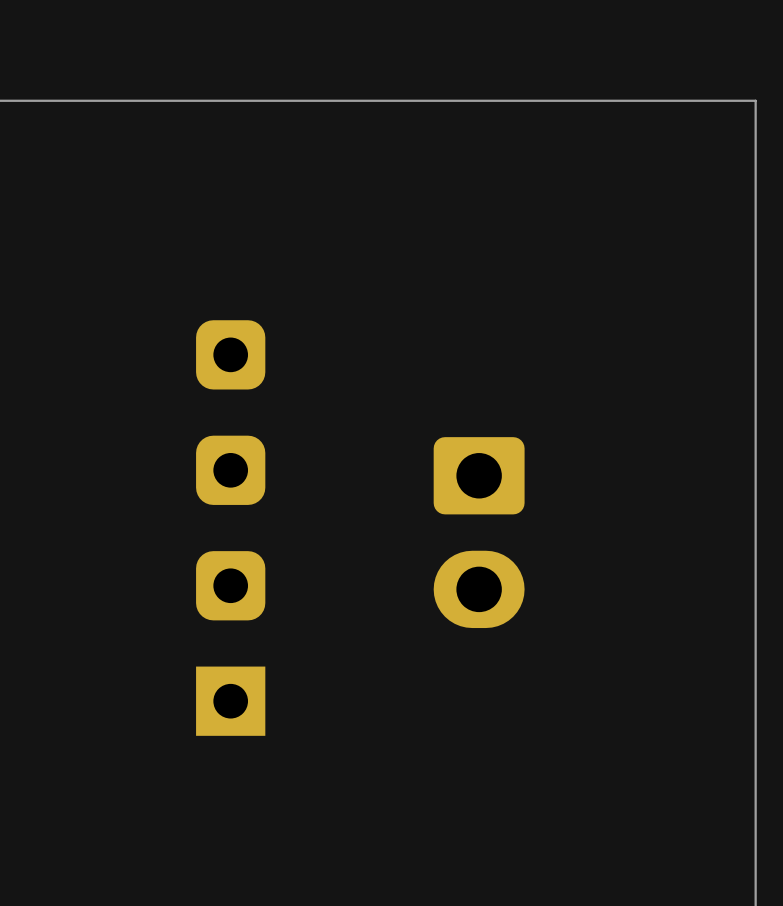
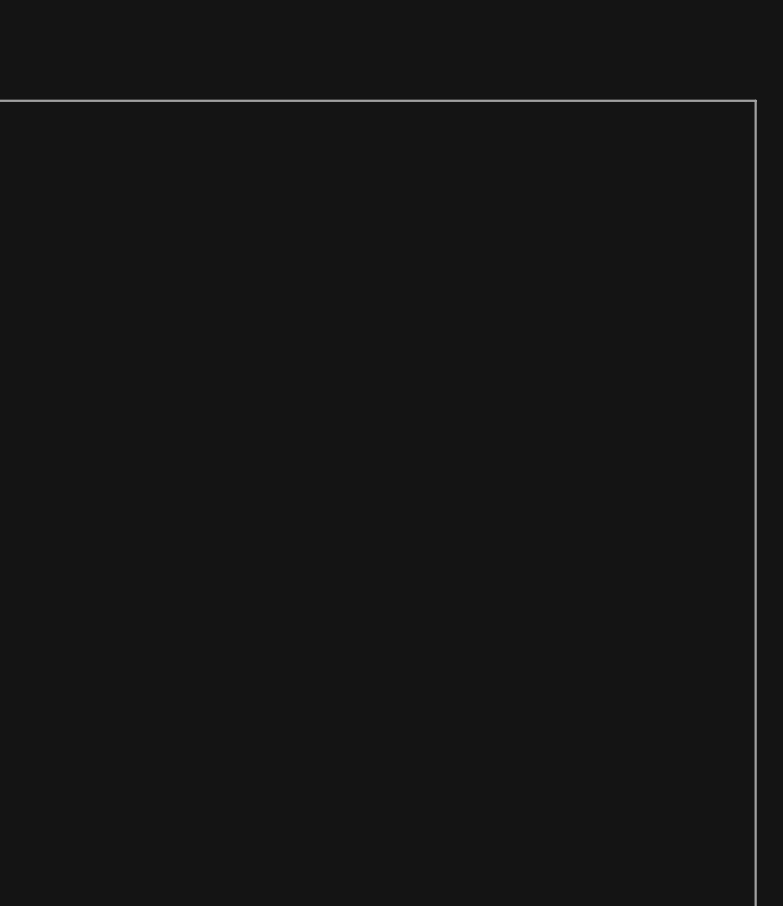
part: (230, 528) -> none
part: (479, 532) -> none

